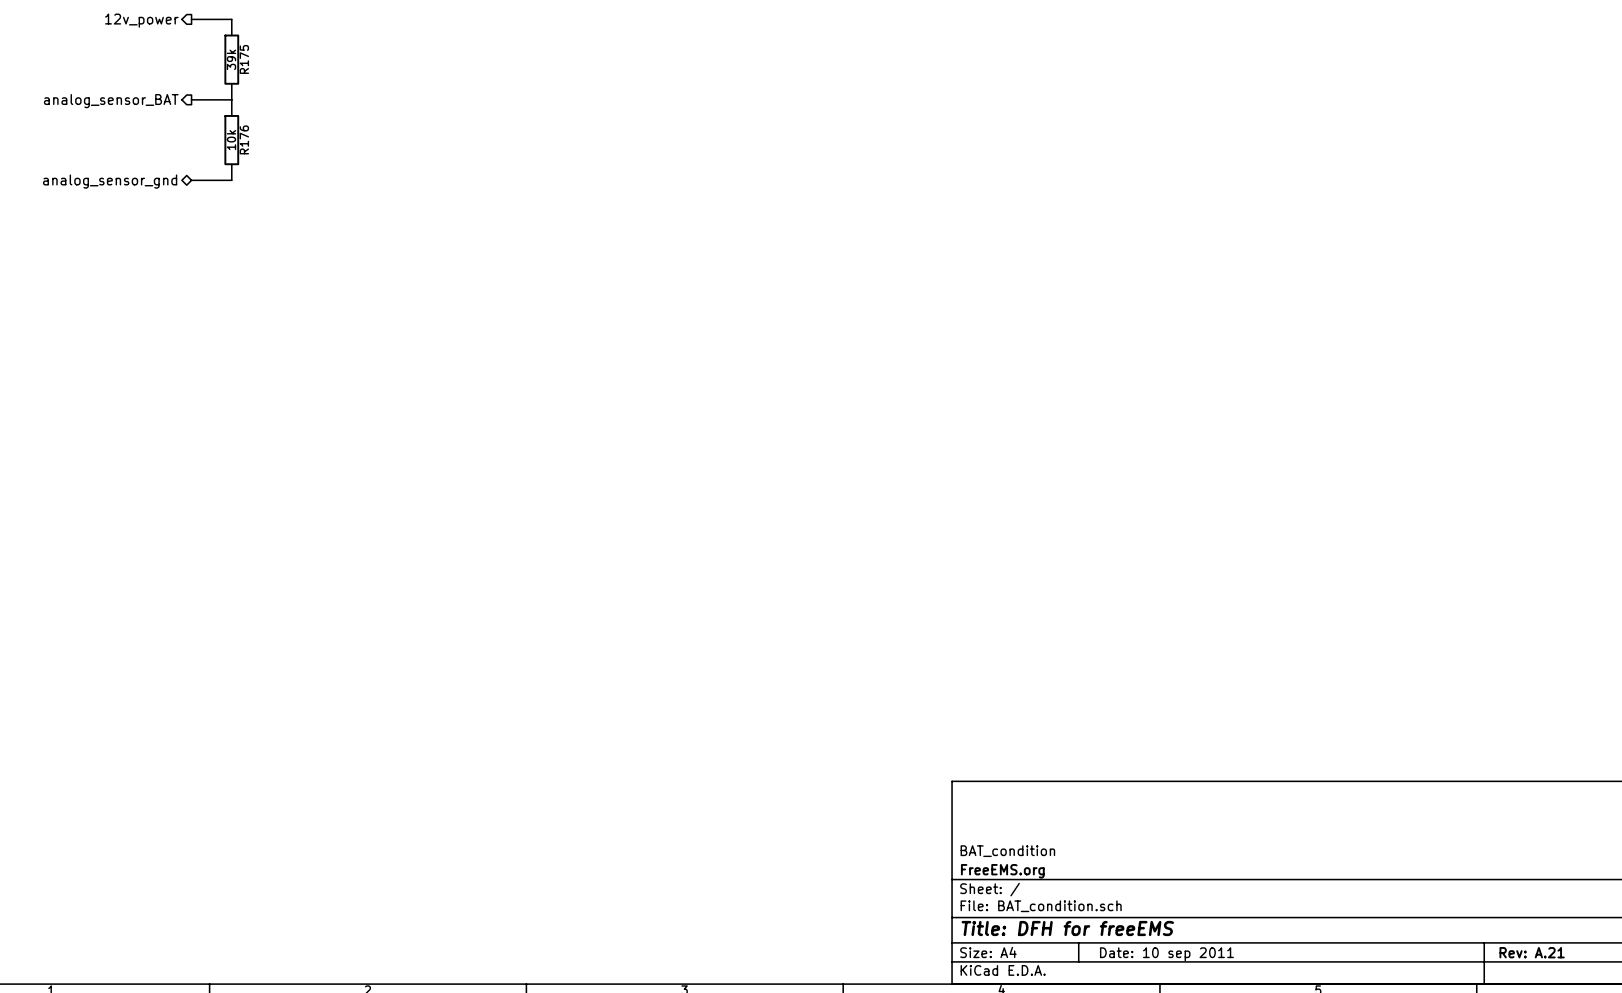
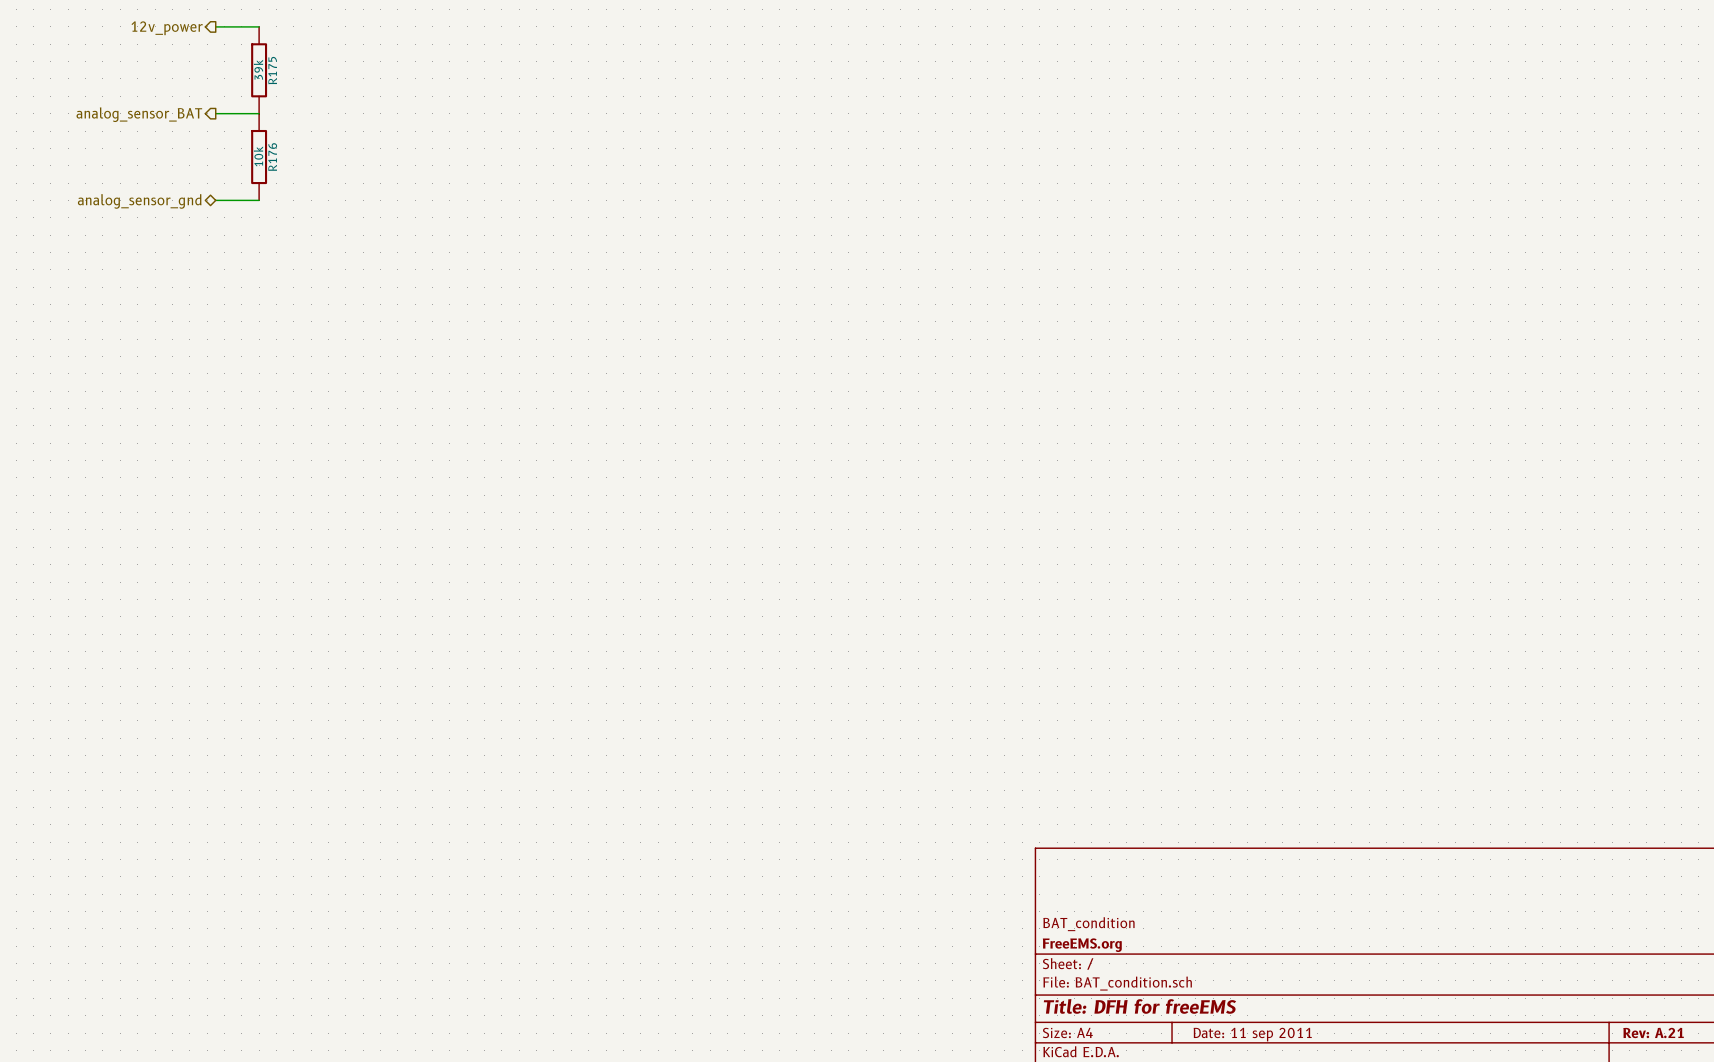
title block: Date: 10 sep 2011 (1166, 954) -> Date: 11 sep 2011 (1252, 1034)

